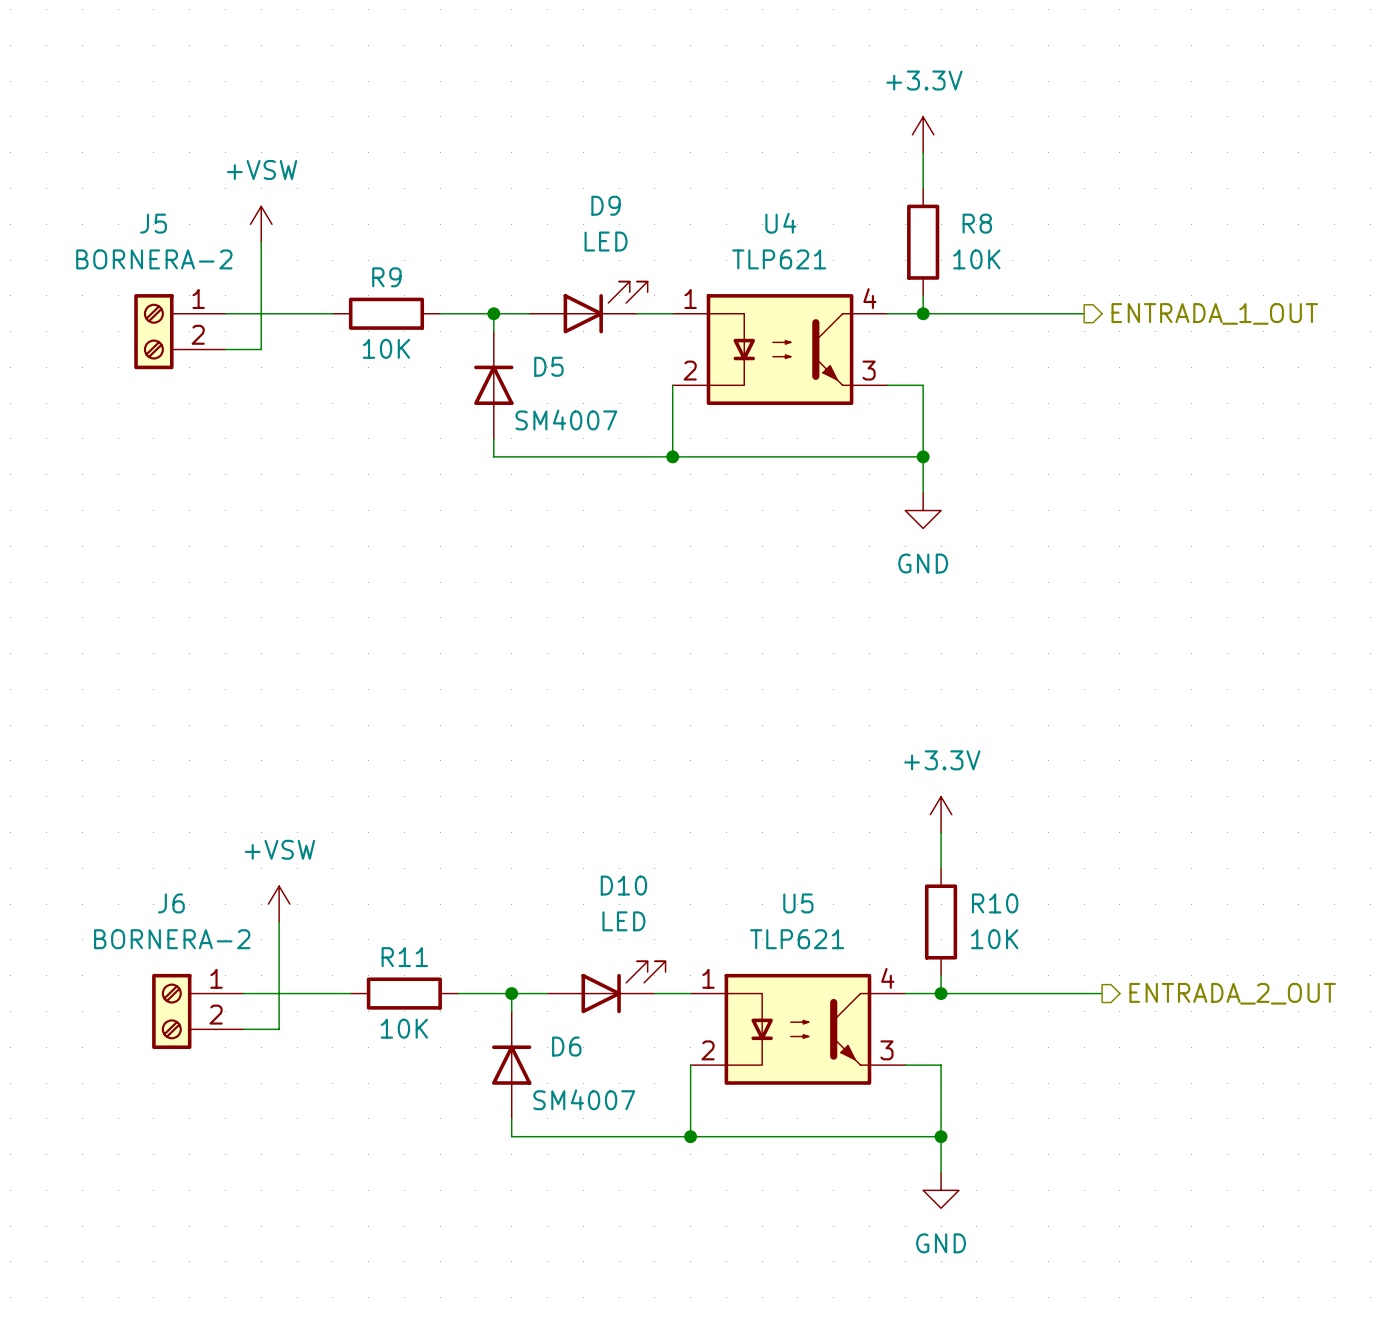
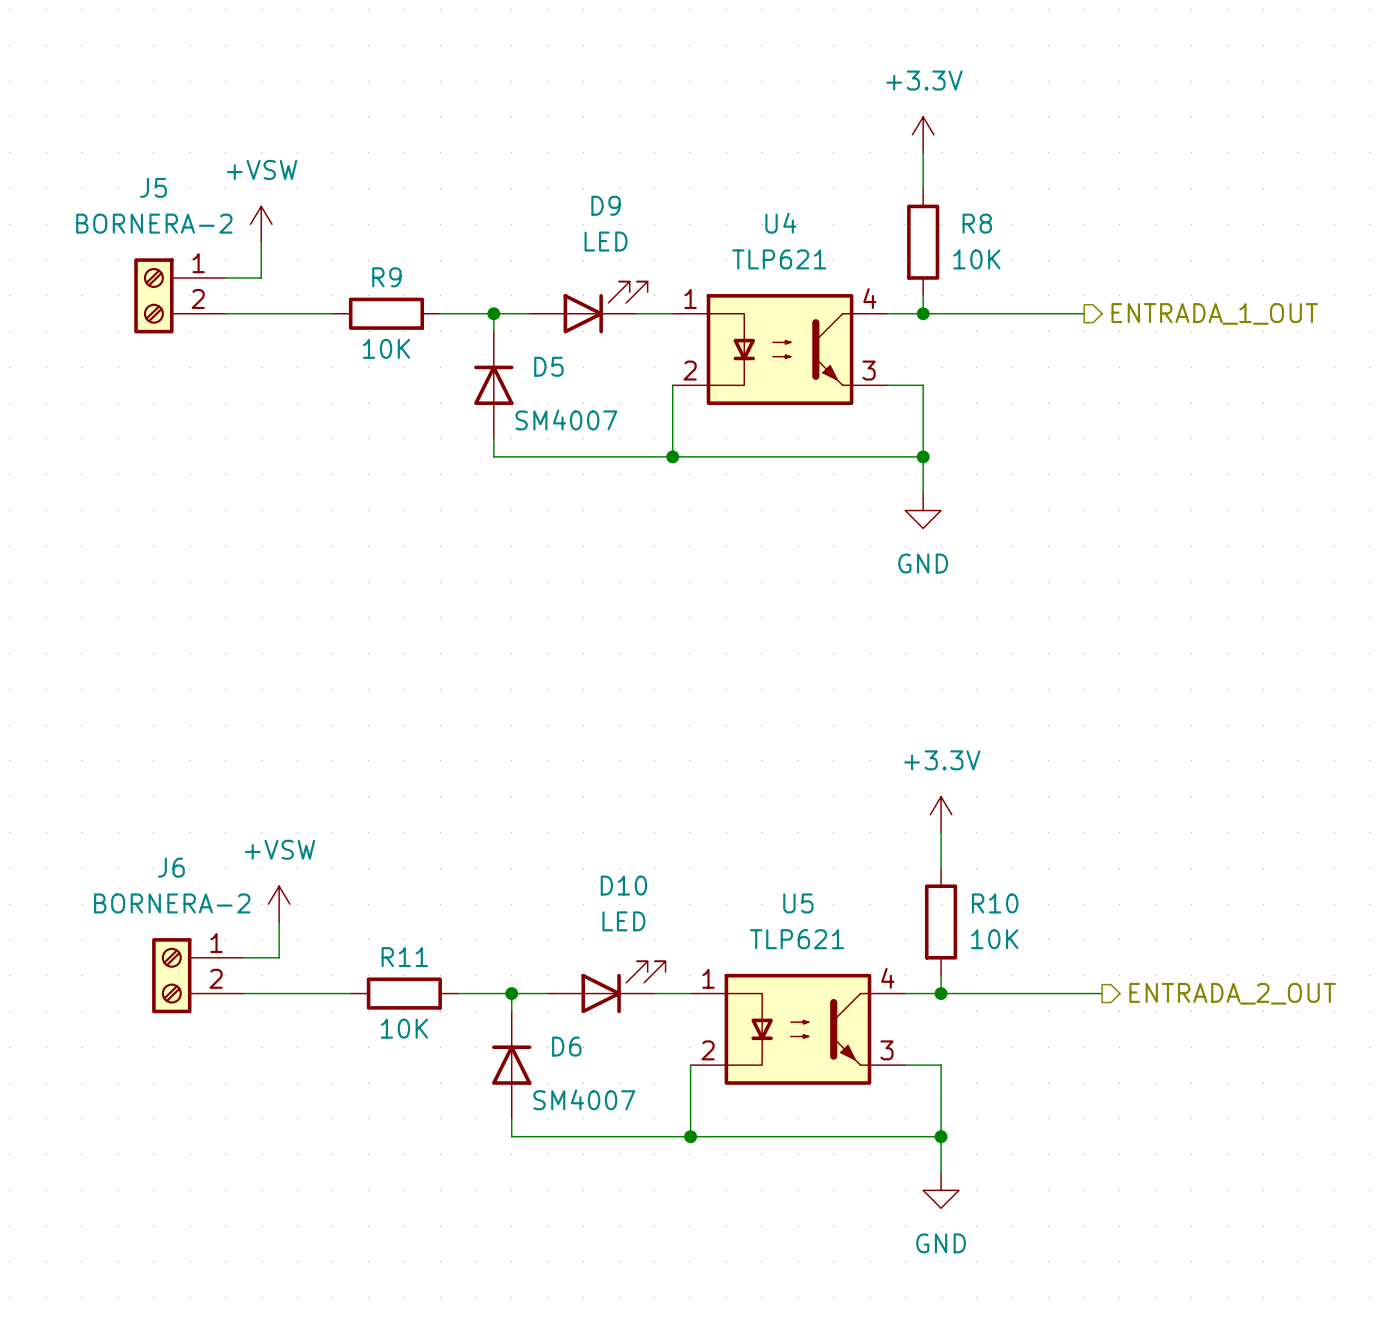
wire: (261, 277) (261, 349) (225, 349) -> (261, 277) (225, 277)
J5 position: (179, 331) -> (179, 295)
wire: (279, 957) (279, 1029) (243, 1029) -> (279, 957) (243, 957)
J6 position: (197, 1011) -> (197, 975)

